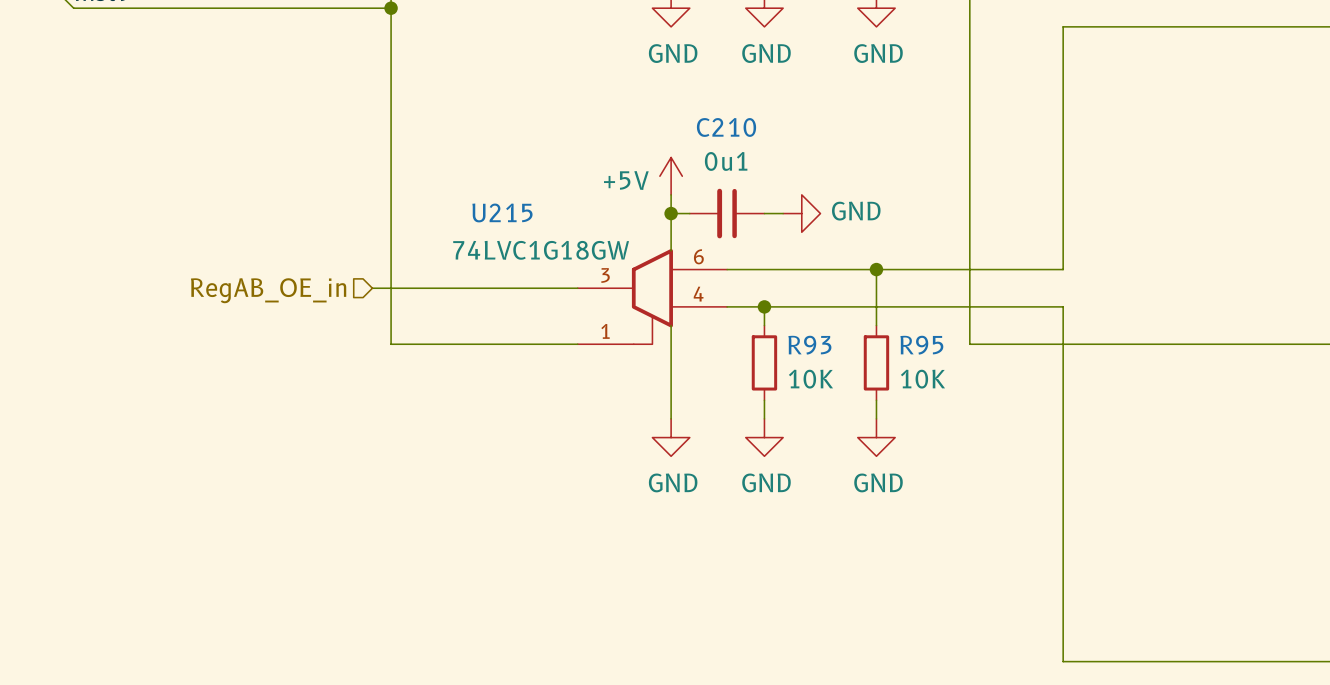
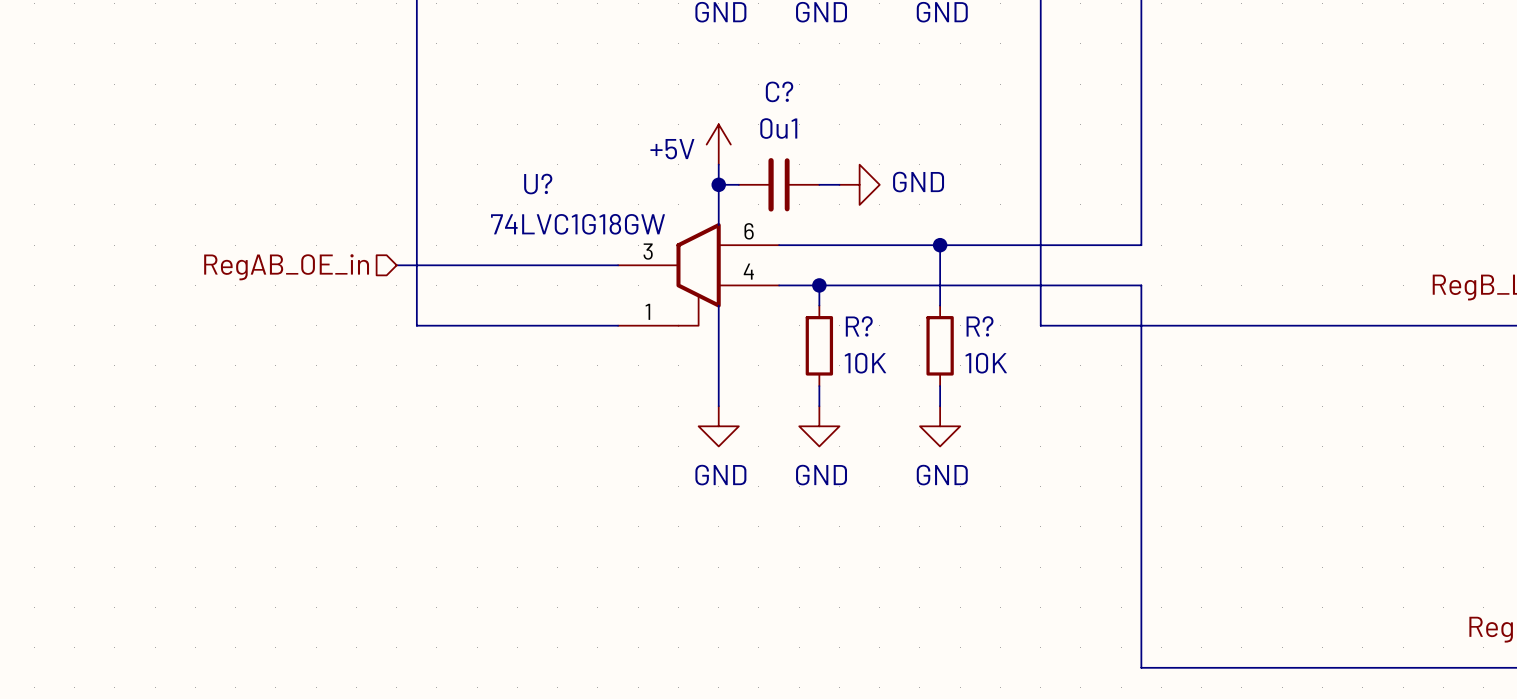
C210 name: C210 (726, 127) -> C? (779, 91)
U215 name: U215 (502, 212) -> U? (538, 184)
R93 name: R93 (809, 345) -> R? (859, 326)
R95 name: R95 (921, 345) -> R? (980, 326)

